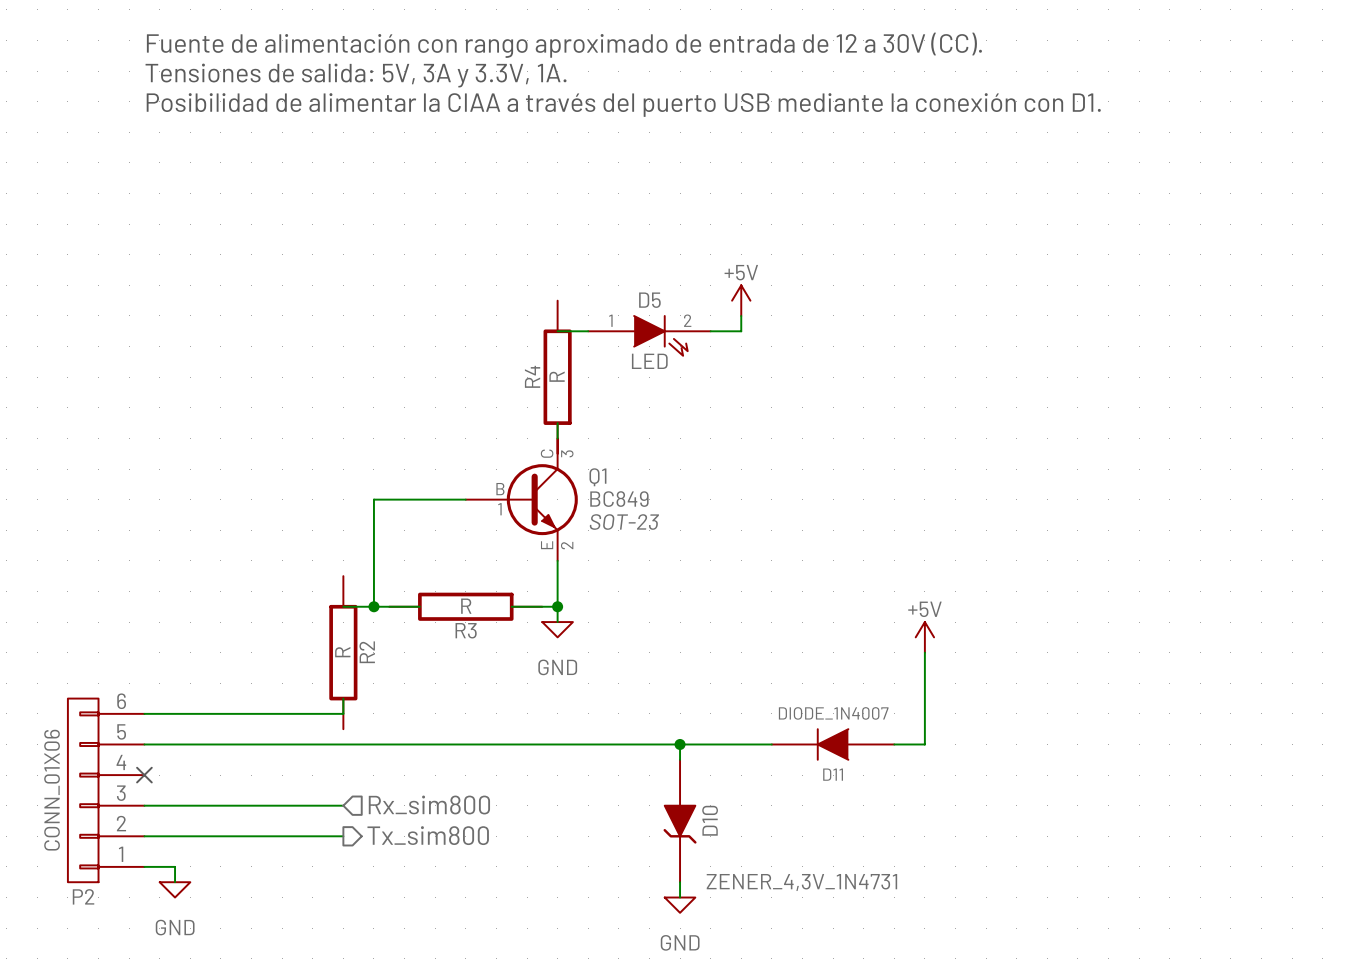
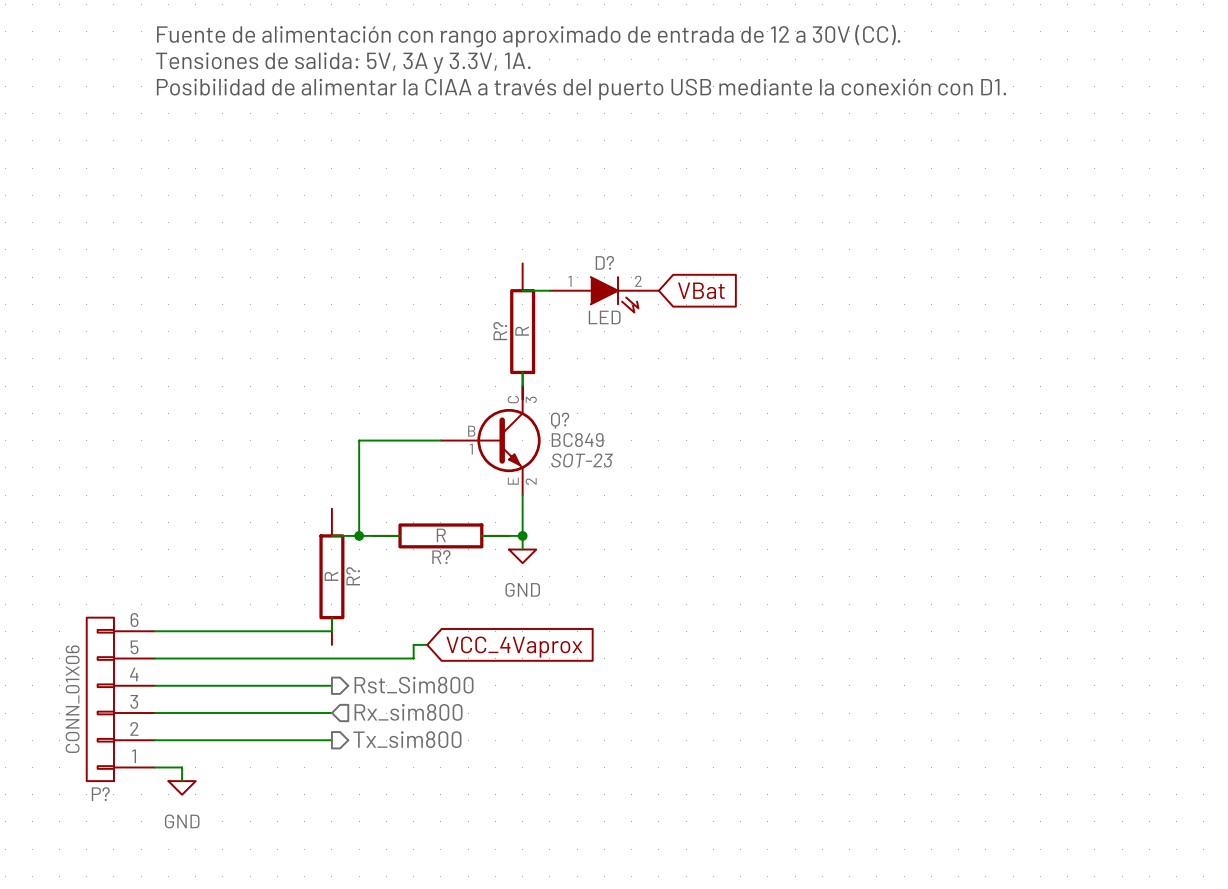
D5 name: D5 (649, 300) -> D? (604, 262)
power symbol: +5V (741, 300) -> none
wire: (741, 315) (741, 331) (710, 331) -> none
global label: none -> VBat (701, 290)
R4 name: R4 (532, 376) -> R? (500, 331)
Q1 name: Q1 (597, 477) -> Q? (560, 420)
R3 name: R3 (466, 630) -> R? (441, 557)
power symbol: +5V (924, 637) -> none
R2 name: R2 (367, 652) -> R? (353, 576)
wire: (924, 652) (924, 744) (894, 744) -> none
global label: none -> VCC_4Vaprox (514, 647)
wire: (435, 744) (771, 744) -> (413, 658) (413, 644) (427, 644)
wire: (680, 744) (680, 759) -> none
junction: (680, 744) -> none
D11: DIODE_1N4007 (833, 744) -> none
hierarchical label: none -> Rst_Sim800 (414, 685)
wire: none -> (154, 685) (331, 685)
no-connect mark: (144, 775) -> none
D10: ZENER_4,3V_1N4731 (680, 821) -> none
wire: (680, 882) (680, 897) -> none
P2 name: P2 (83, 896) -> P? (100, 794)
power symbol: GND (680, 905) -> none

